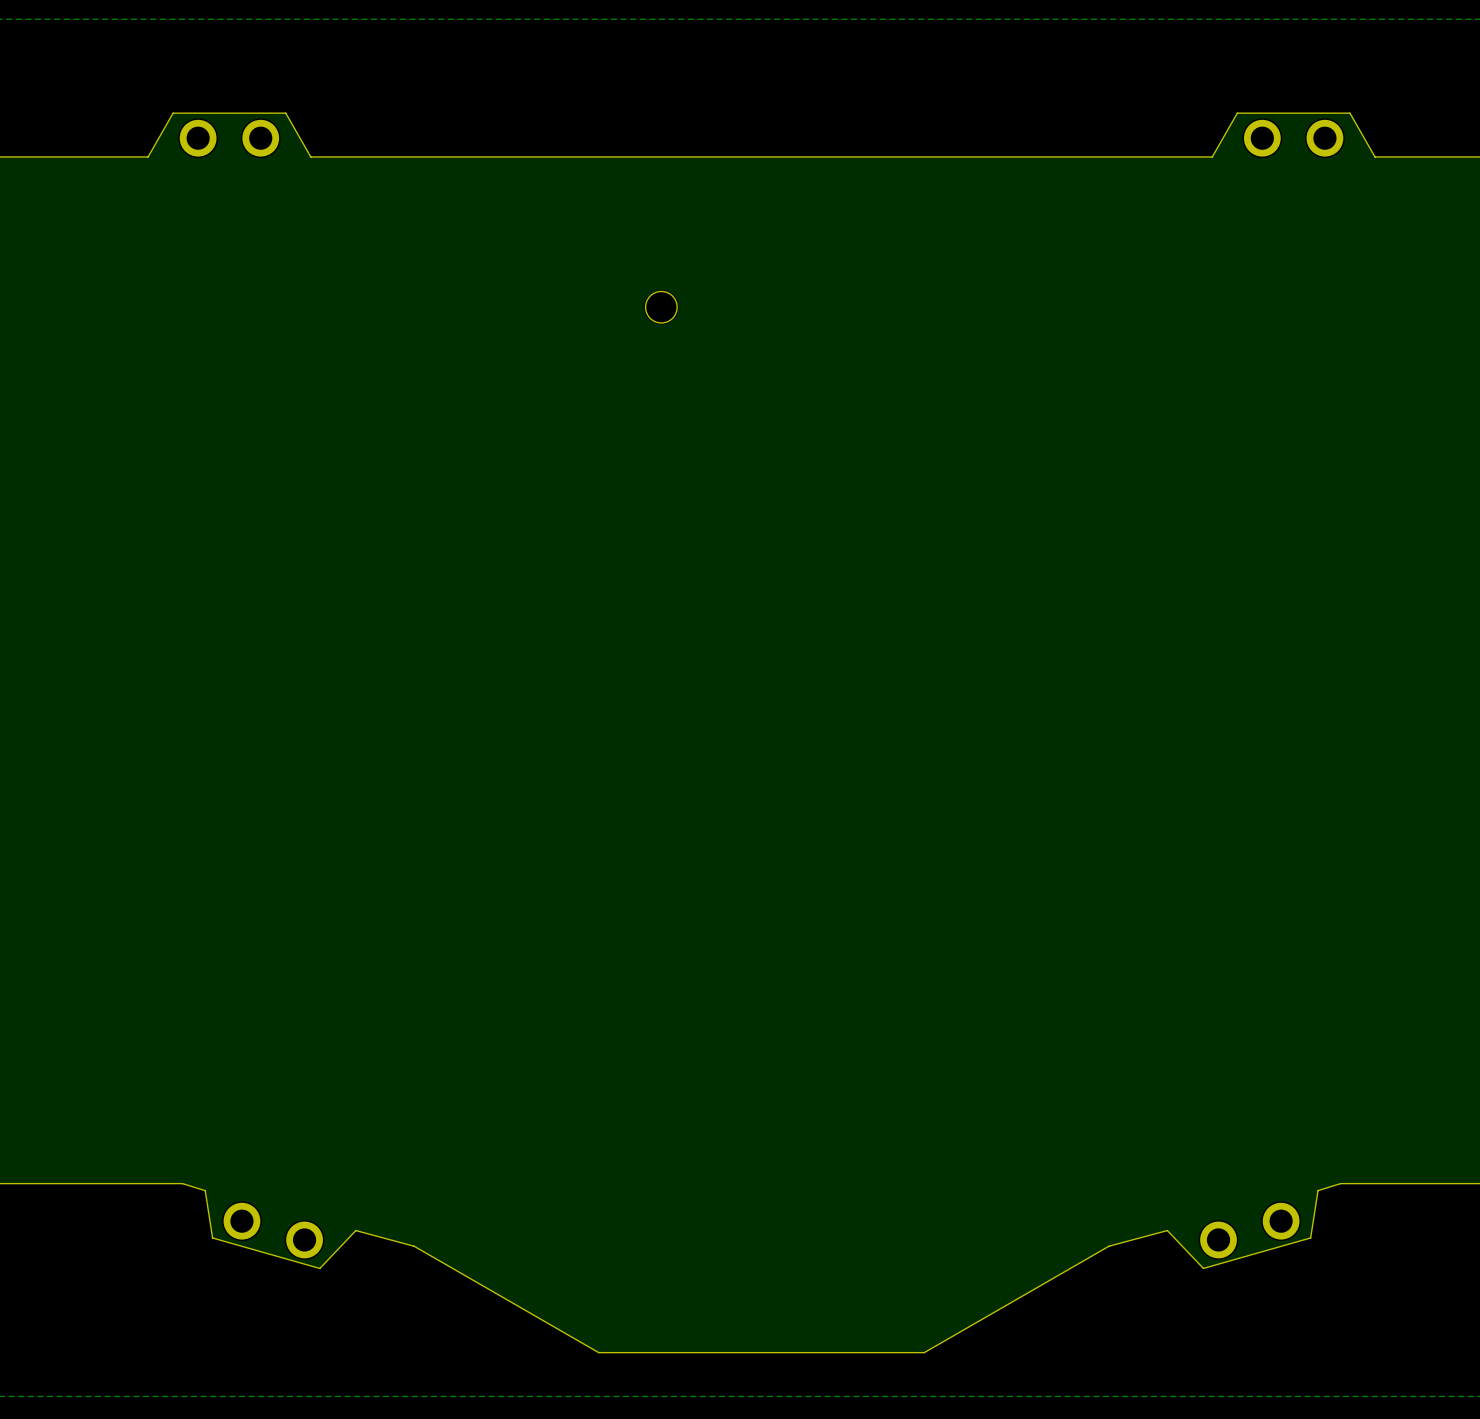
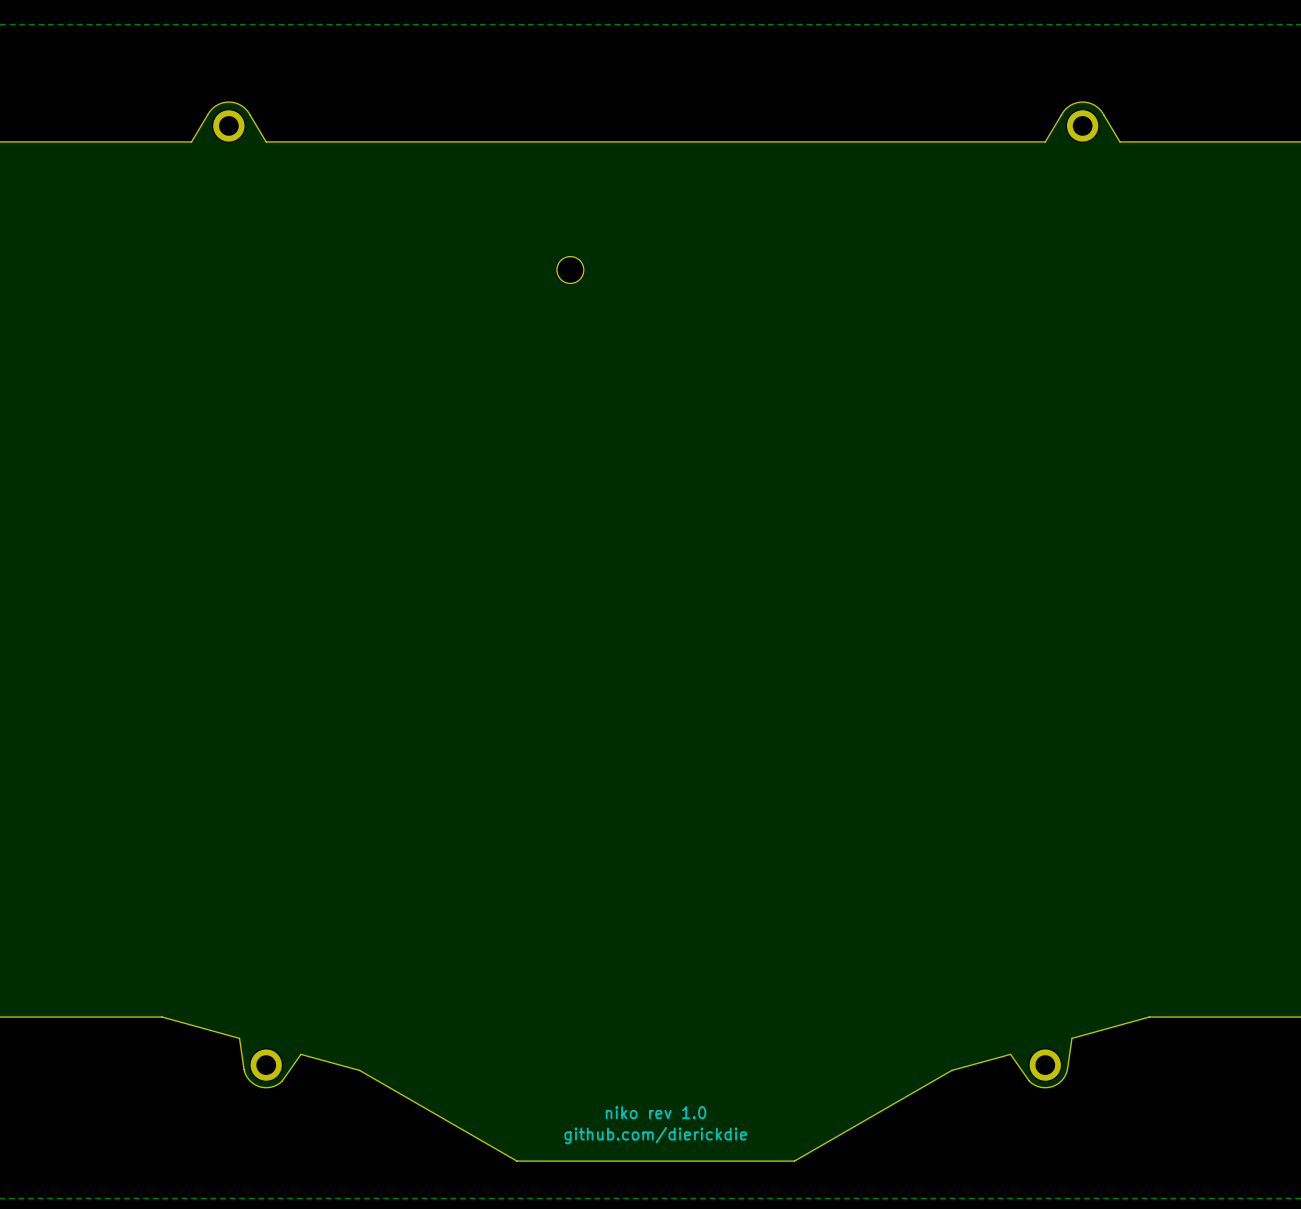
part: (198, 138) -> none
part: (1324, 138) -> none
board edge: (310, 156) (285, 113) (173, 113) (148, 156) -> (271, 141) (266, 141) (244, 108) (237, 103) (228, 102) (217, 104) (210, 110) (191, 141) (132, 141)
board edge: (1375, 156) (1349, 113) (1237, 113) (1212, 156) -> (1178, 141) (1119, 141) (1100, 110) (1091, 103) (1082, 102) (1074, 103) (1066, 108) (1045, 141) (1039, 141)
board edge: (182, 1183) (205, 1190) (212, 1237) (319, 1268) (355, 1230) (414, 1246) -> (162, 1017) (239, 1038) (244, 1069) (250, 1081) (257, 1085) (267, 1087) (282, 1081)
board edge: (1340, 1183) (1318, 1190) (1310, 1237) (1203, 1268) (1167, 1230) (1108, 1246) -> (1149, 1017) (1071, 1038) (1067, 1069) (1061, 1081) (1054, 1085) (1043, 1087) (1029, 1081)
part: (241, 1221) -> none
part: (1281, 1221) -> none
board edge: none -> (359, 1070) (300, 1054) (282, 1081)
board edge: none -> (951, 1070) (1010, 1054) (1029, 1081)
text: none -> niko rev 1.0 (656, 1112)
text: none -> github.com/dierickdie (655, 1135)

